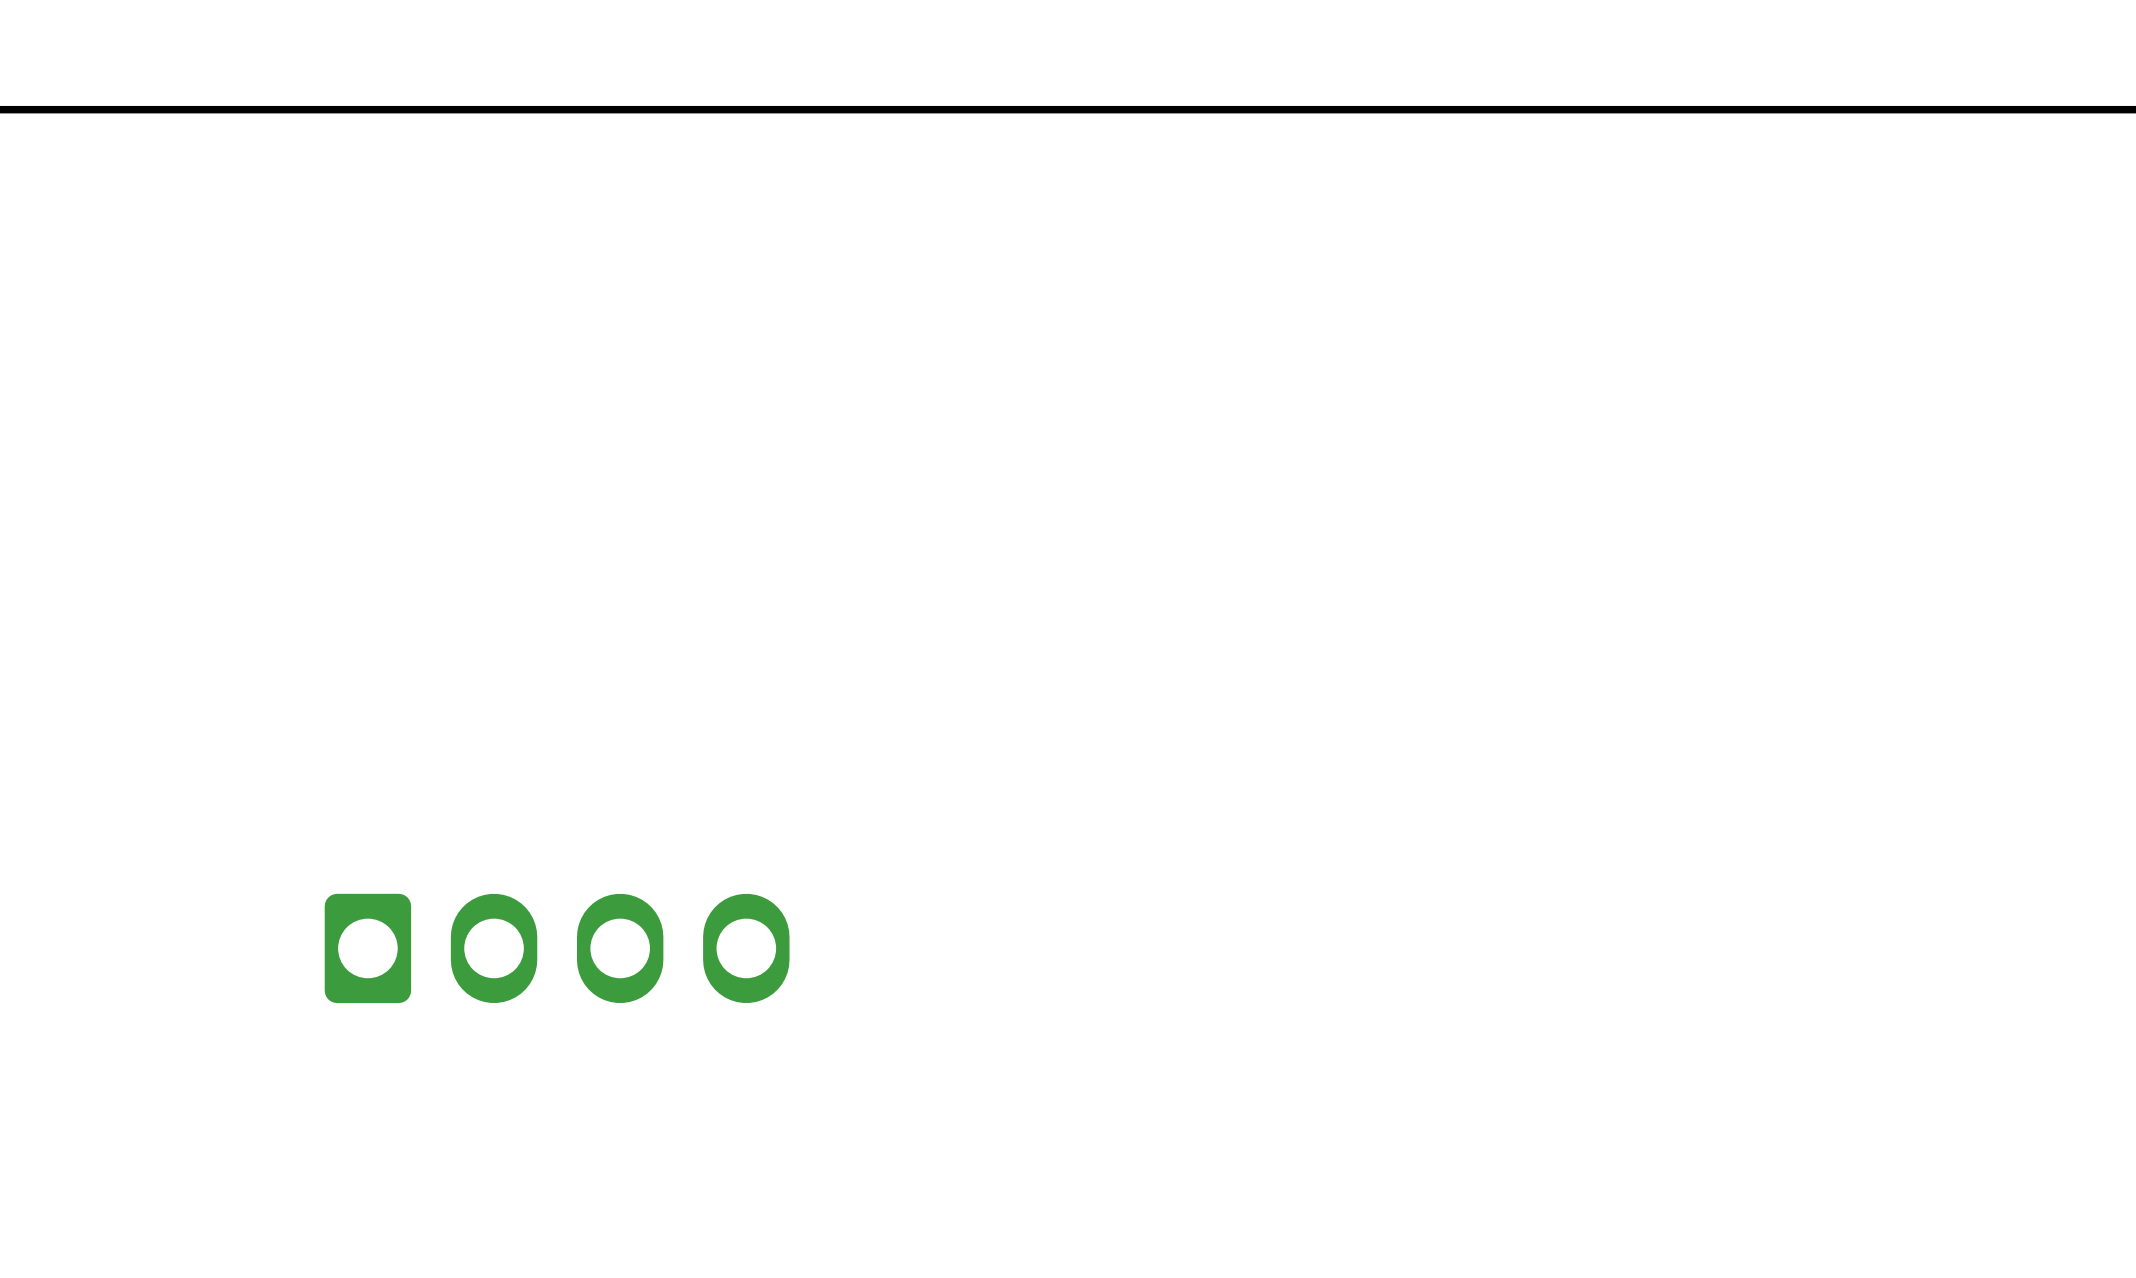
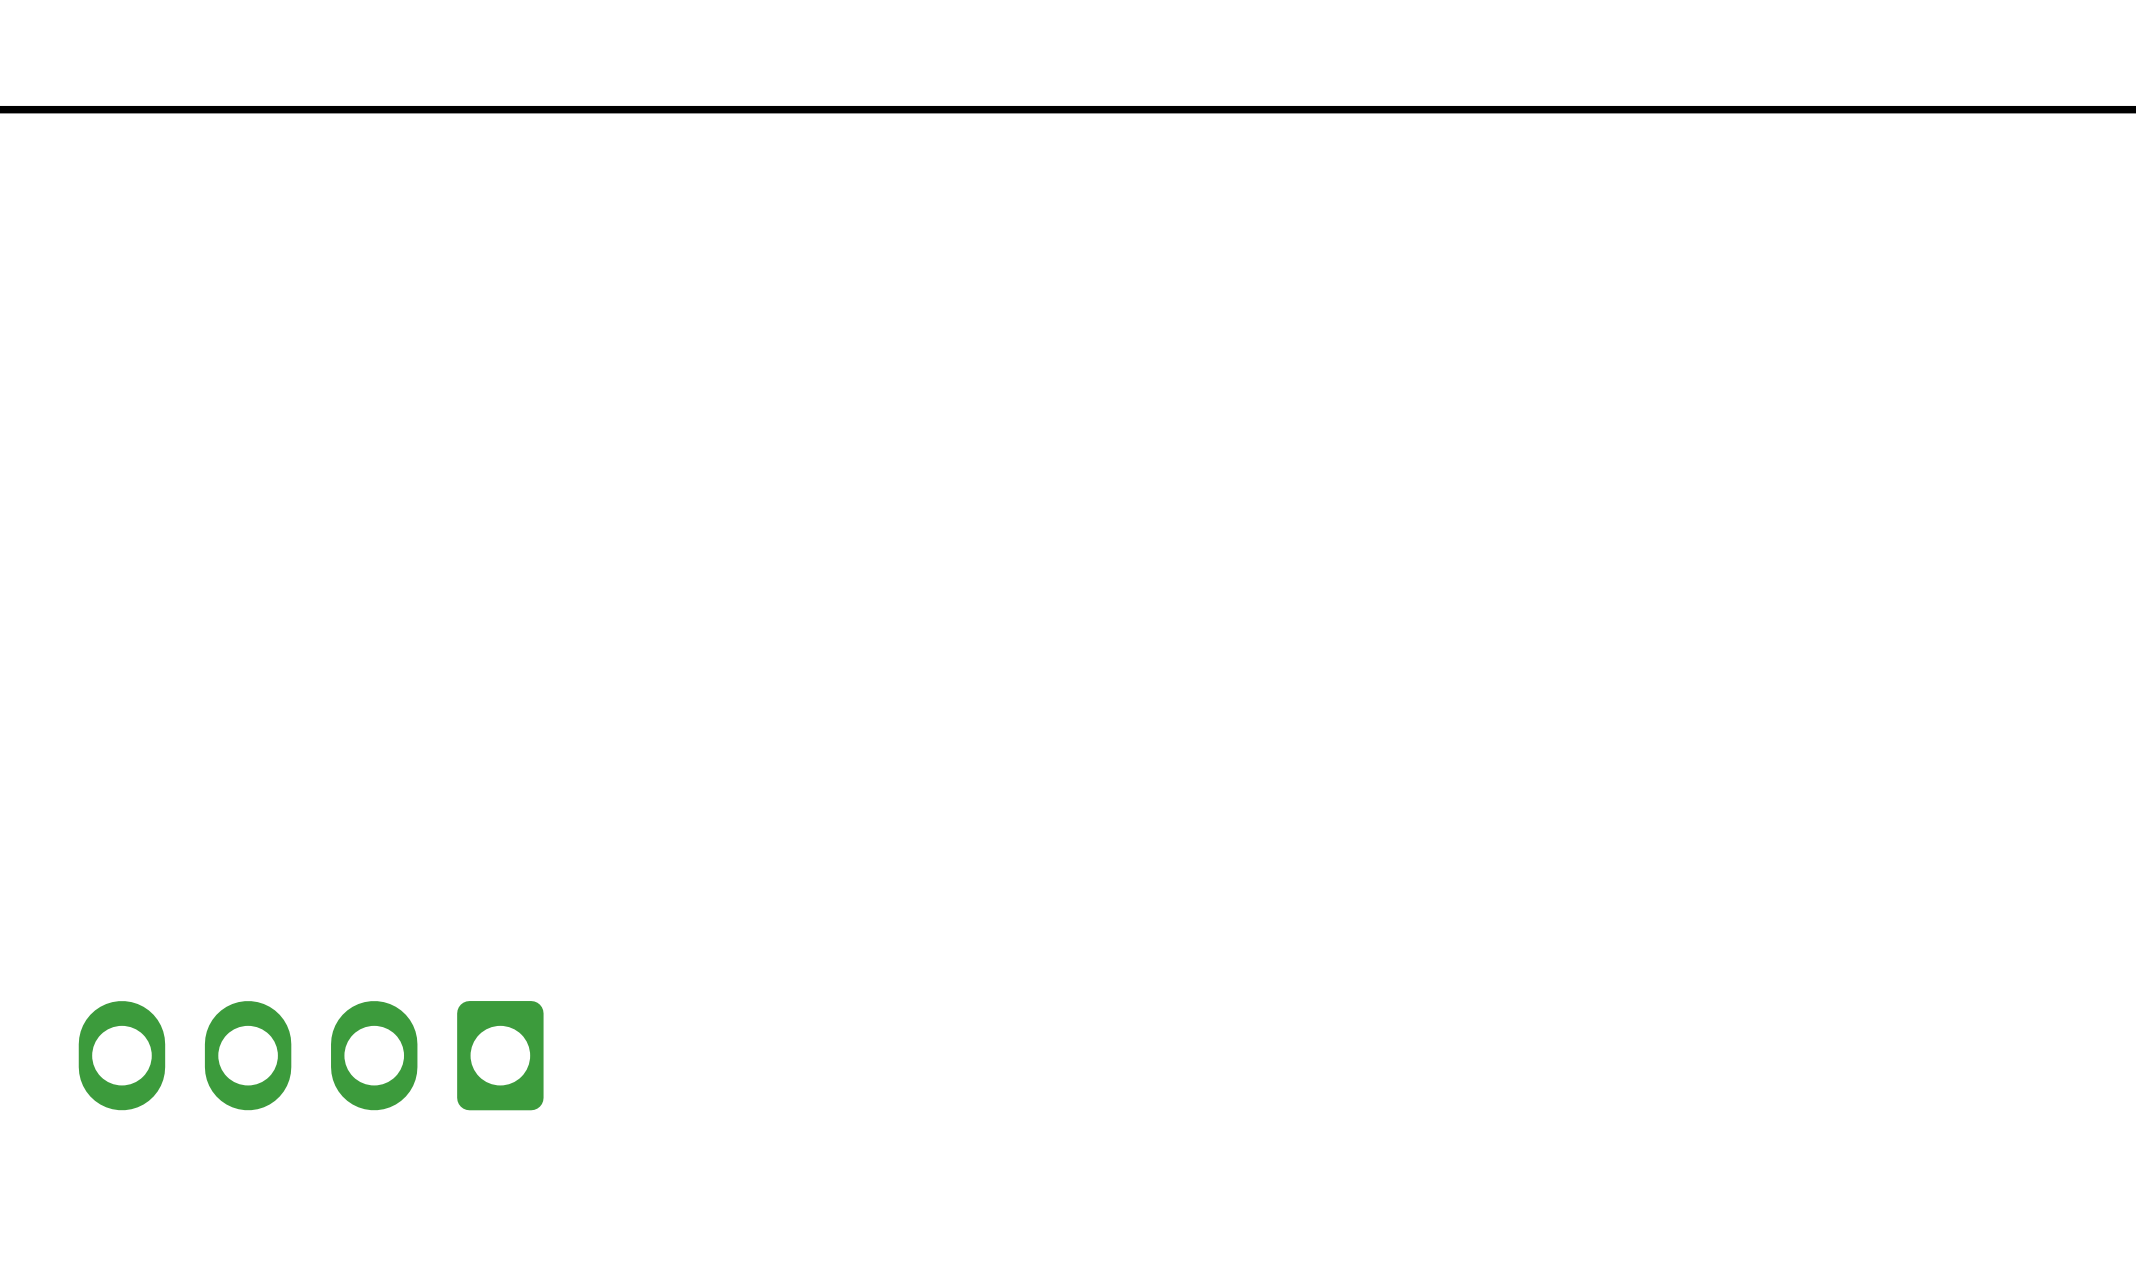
part rotation: 0° (557, 948) -> 180° (311, 1055)

